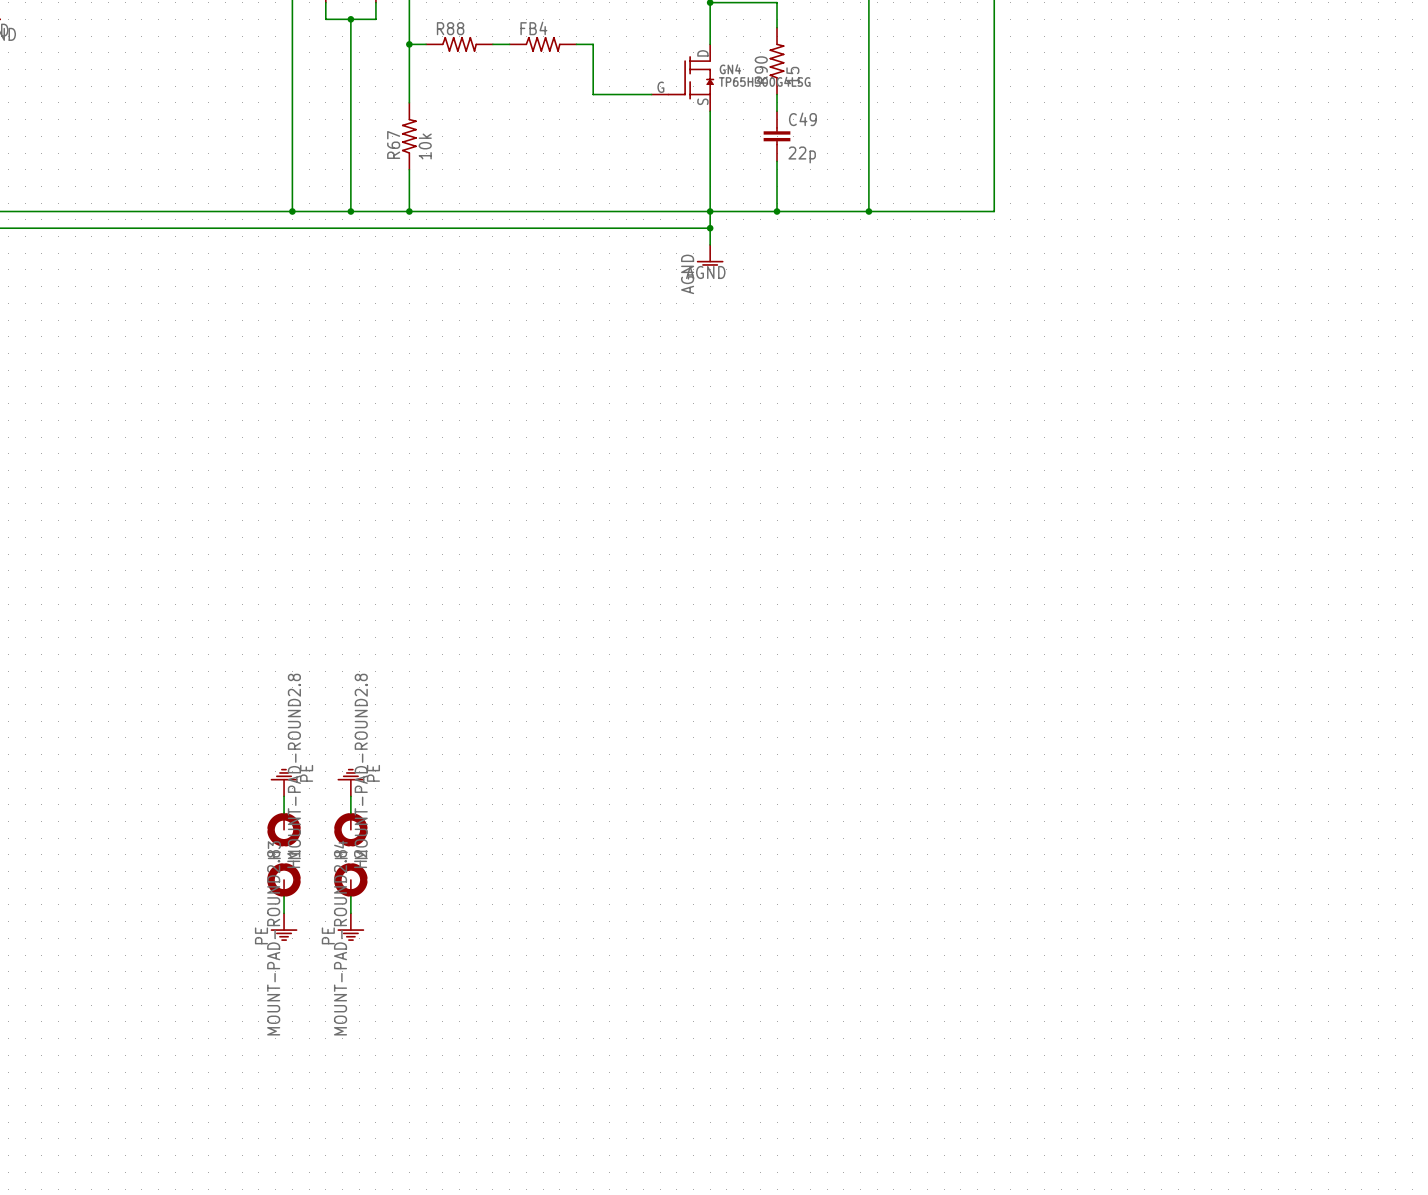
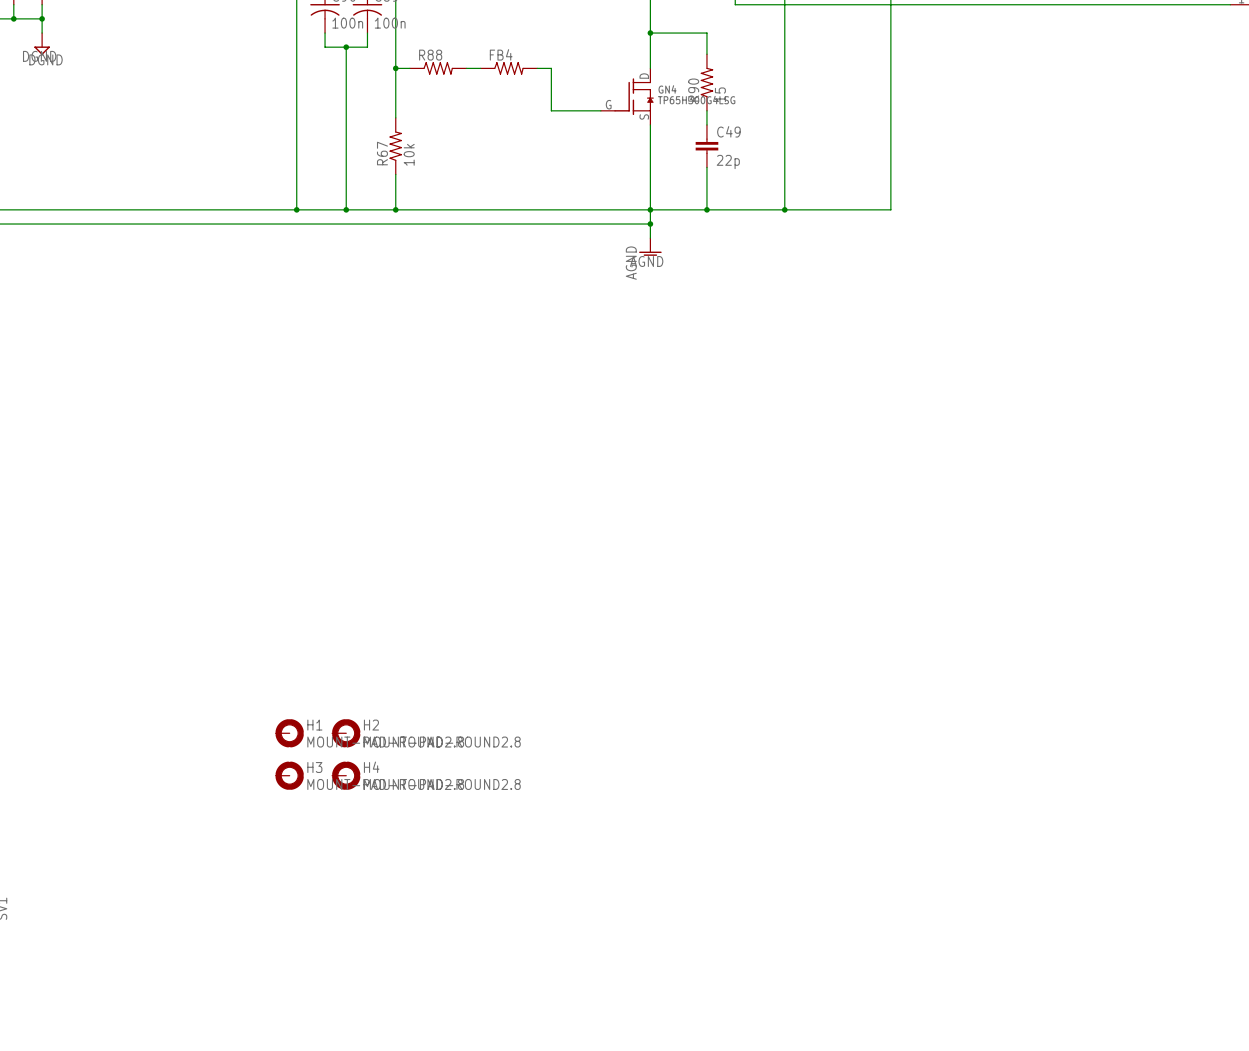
power symbol: PE (284, 782) -> none
power symbol: PE (350, 782) -> none
wire: (284, 796) (284, 813) -> none
wire: (350, 796) (350, 813) -> none
H1 rotation: 0° (284, 829) -> 90° counterclockwise (289, 733)
H2 rotation: 0° (350, 829) -> 90° counterclockwise (346, 733)
H3 rotation: 0° (284, 879) -> 90° clockwise (289, 775)
H4 rotation: 0° (350, 879) -> 90° clockwise (346, 775)
wire: (284, 896) (284, 913) -> none
wire: (350, 896) (350, 913) -> none
power symbol: PE (284, 927) -> none
power symbol: PE (350, 927) -> none

